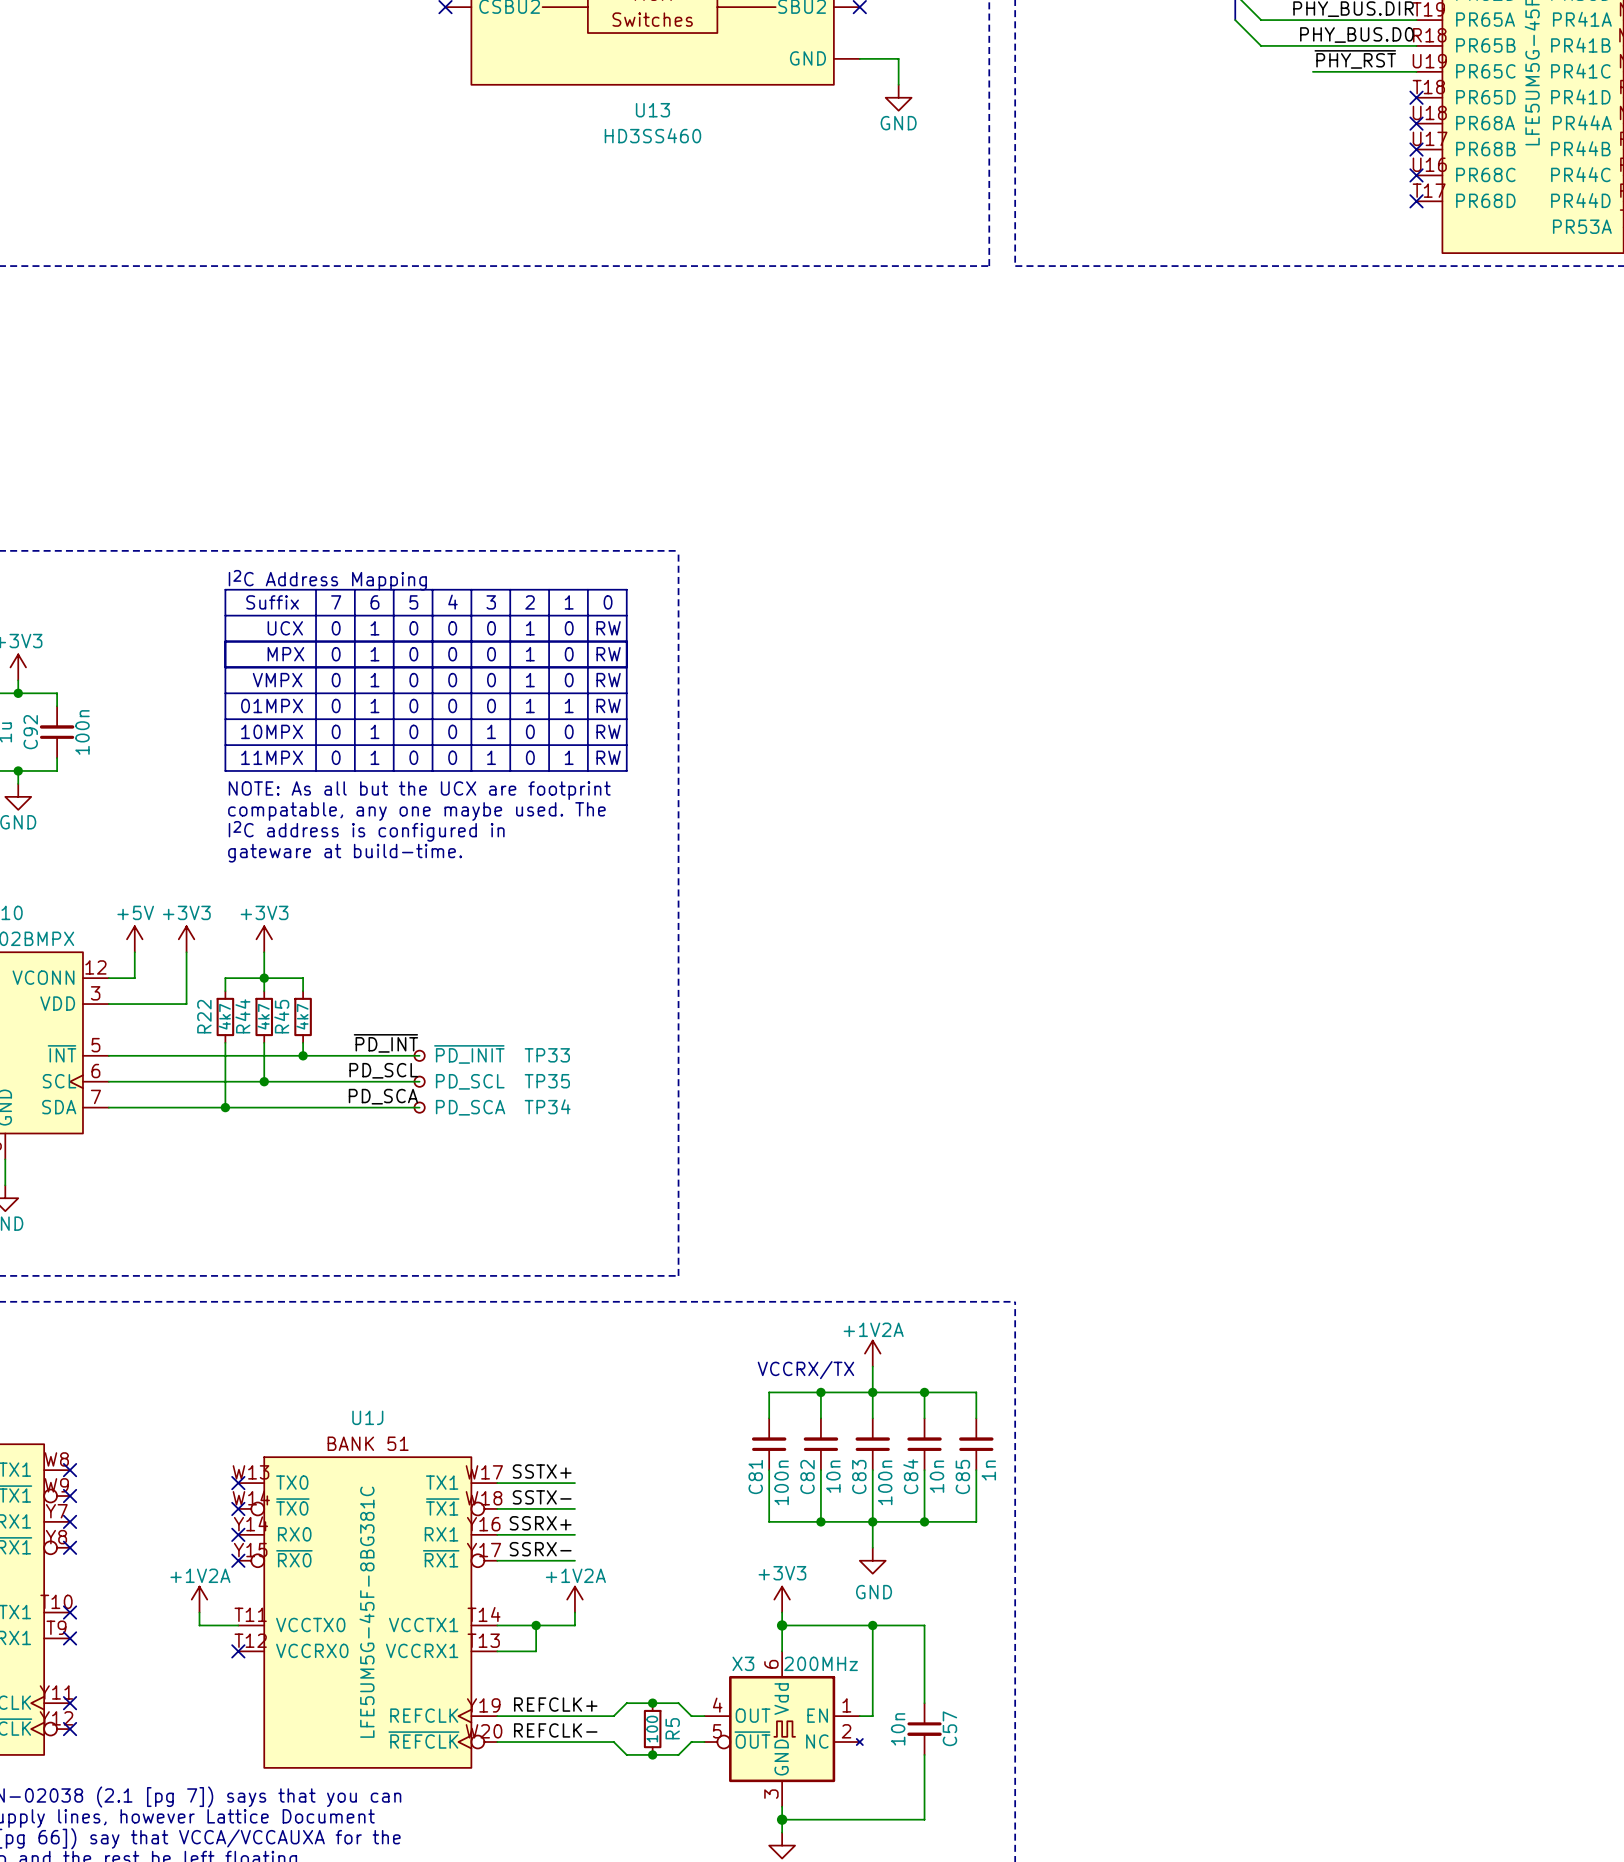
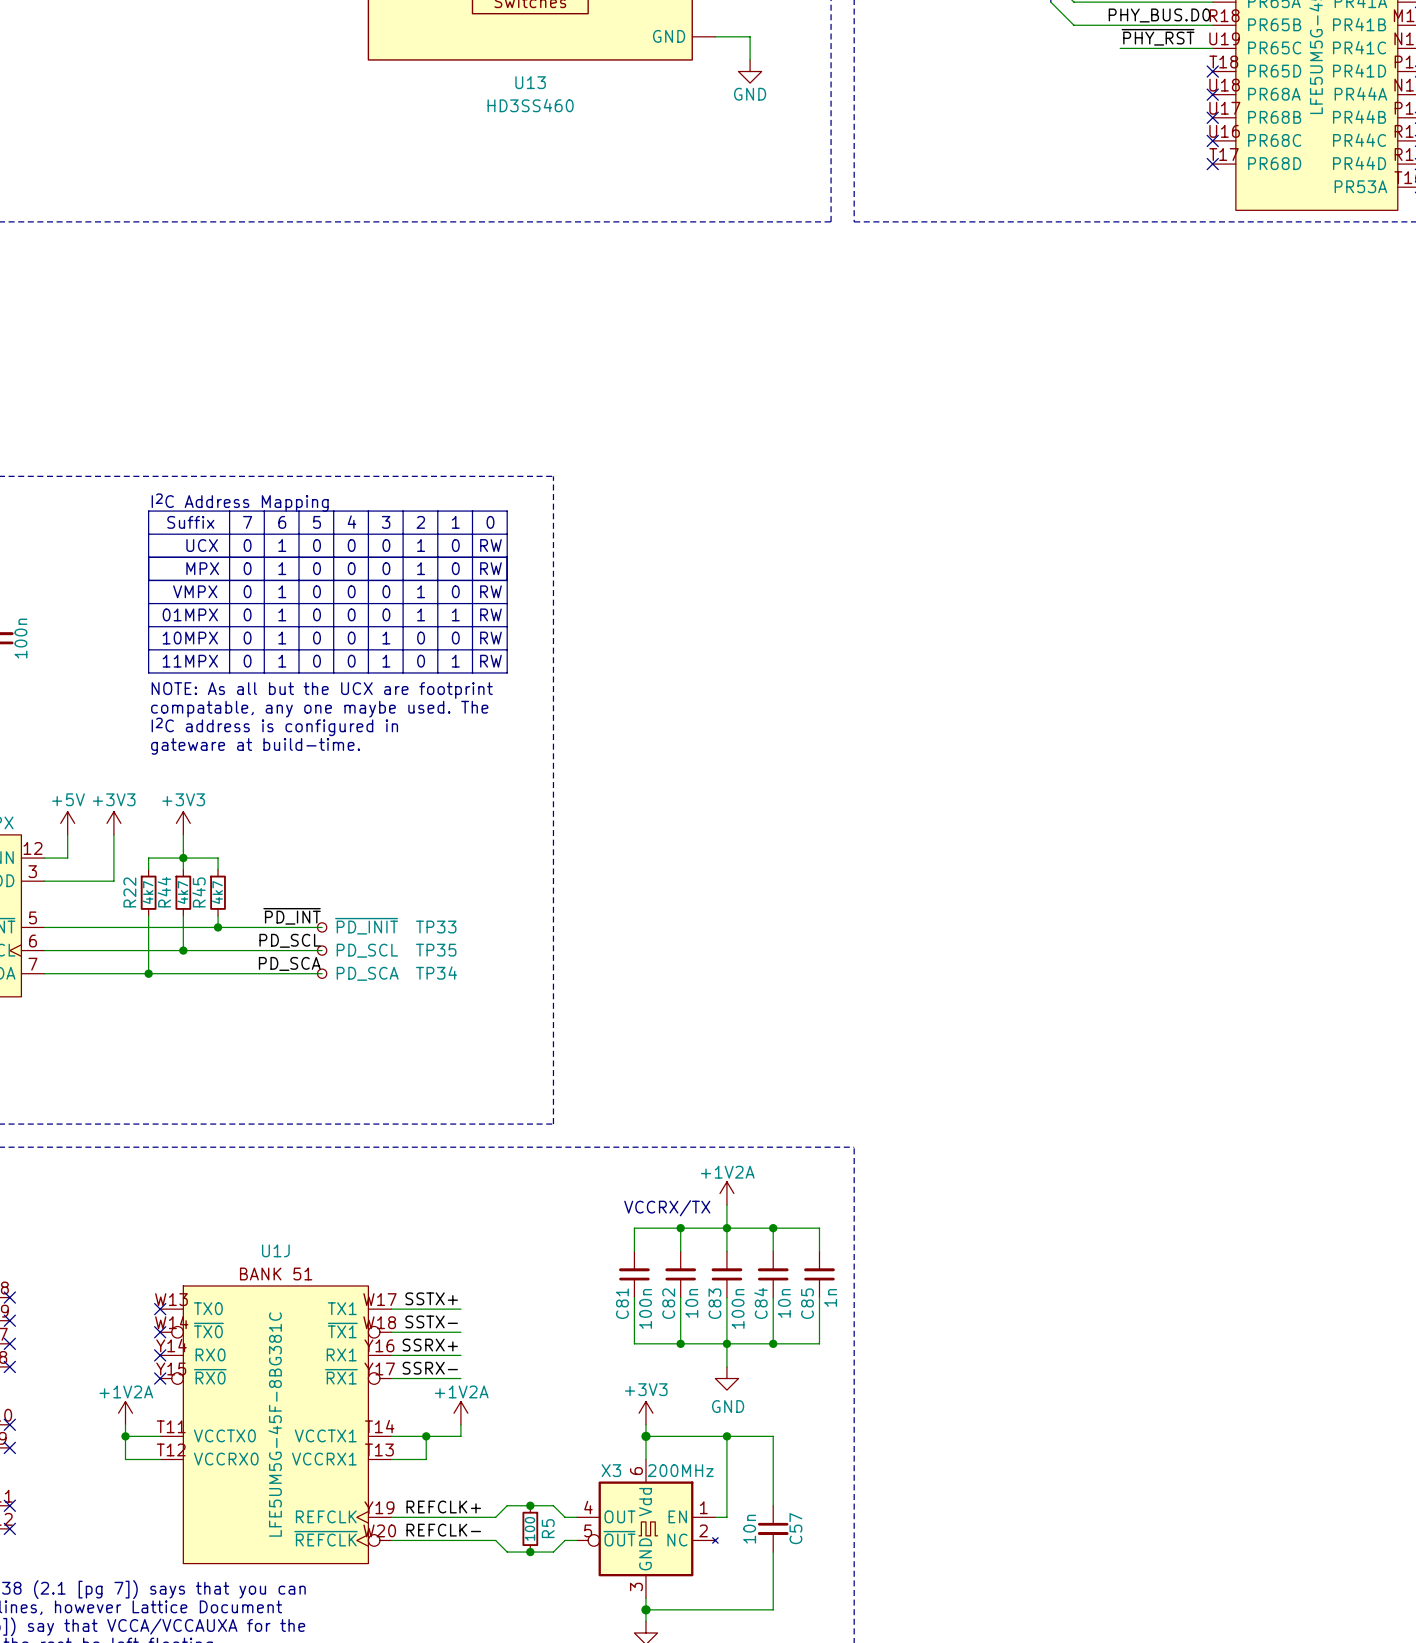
wire: none -> (125, 1436) (125, 1459) (160, 1459)
junction: none -> (125, 1436)
no-connect mark: (238, 1651) -> none

